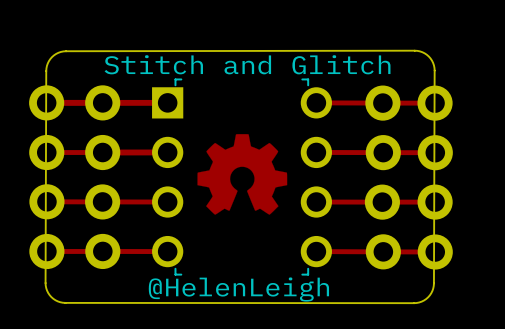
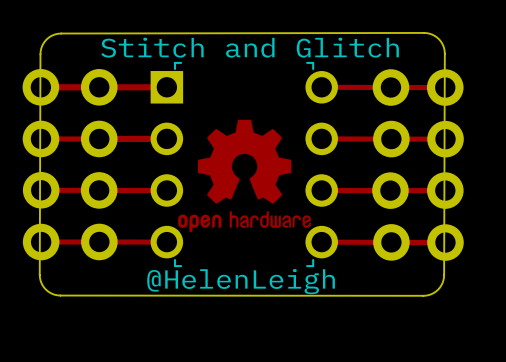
drawing shape: [197, 134, 288, 215] -> [178, 119, 312, 233]

